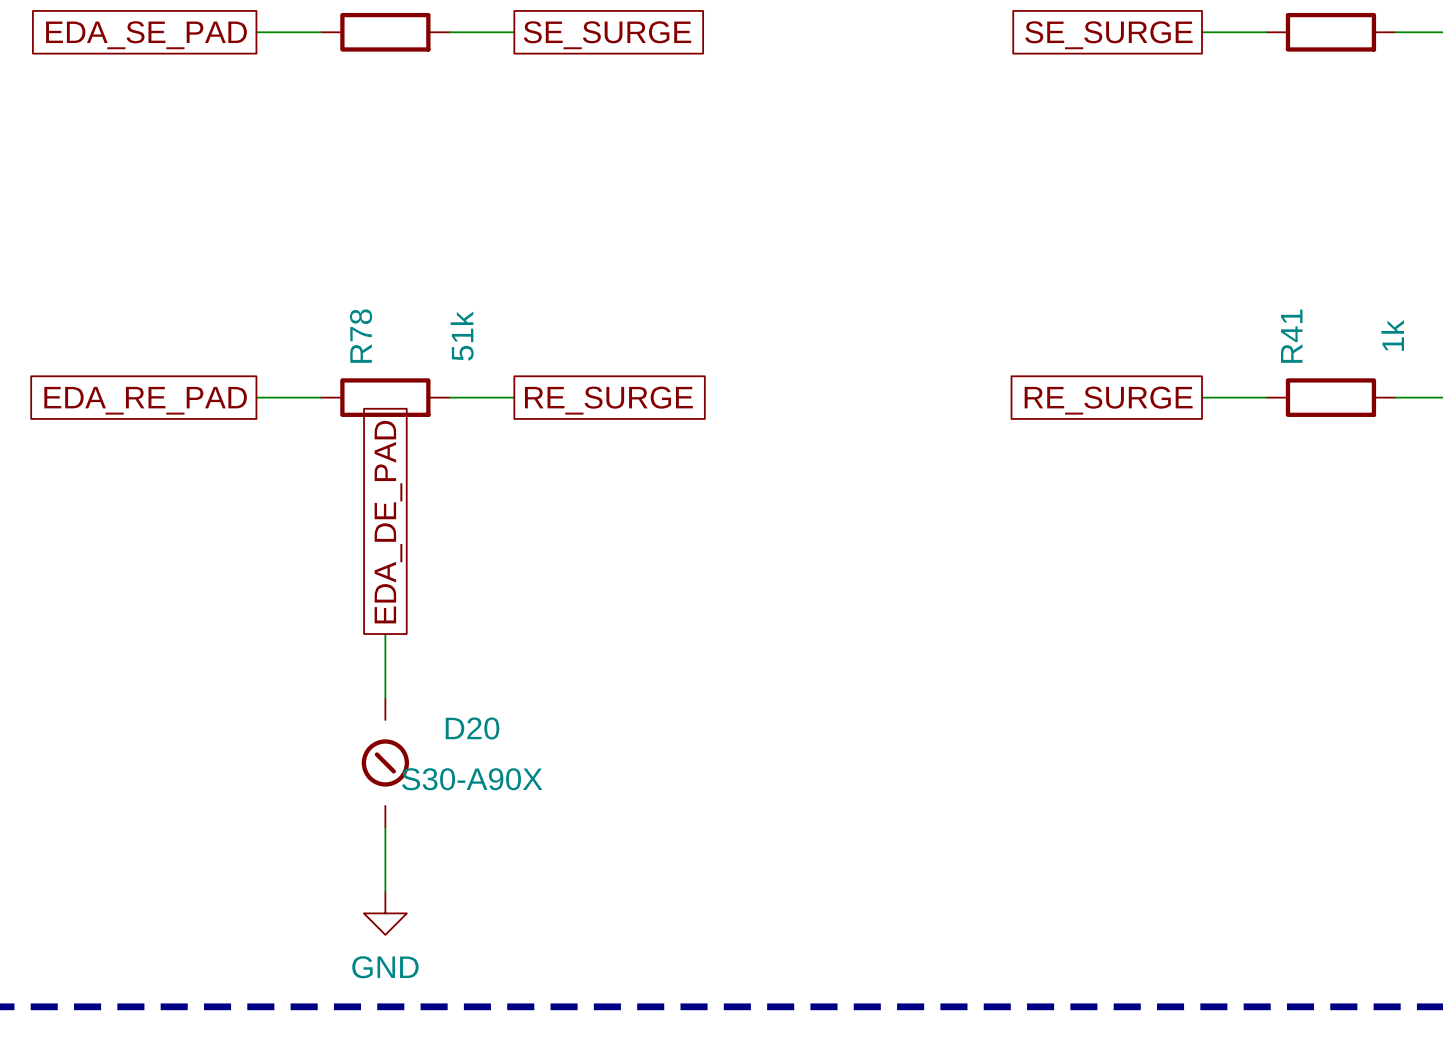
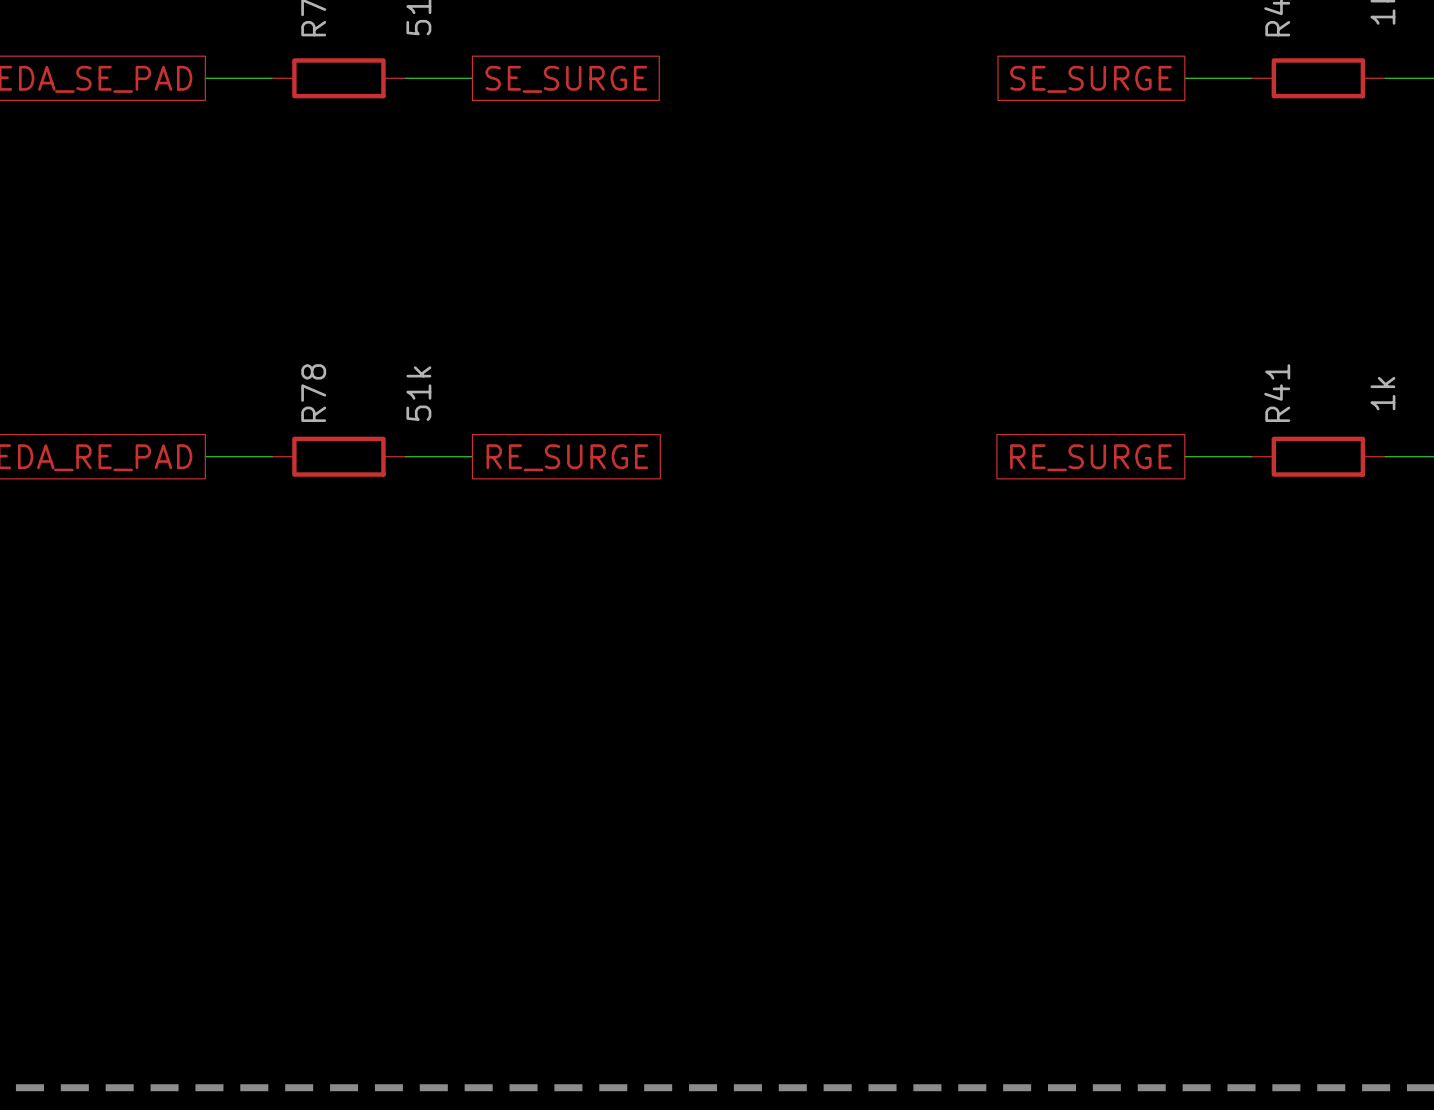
global label: EDA_DE_PAD (388, 522) -> none
wire: (385, 634) (385, 698) -> none
D20: S30-A90X (385, 762) -> none
wire: (385, 827) (385, 891) -> none
power symbol: GND (385, 913) -> none

